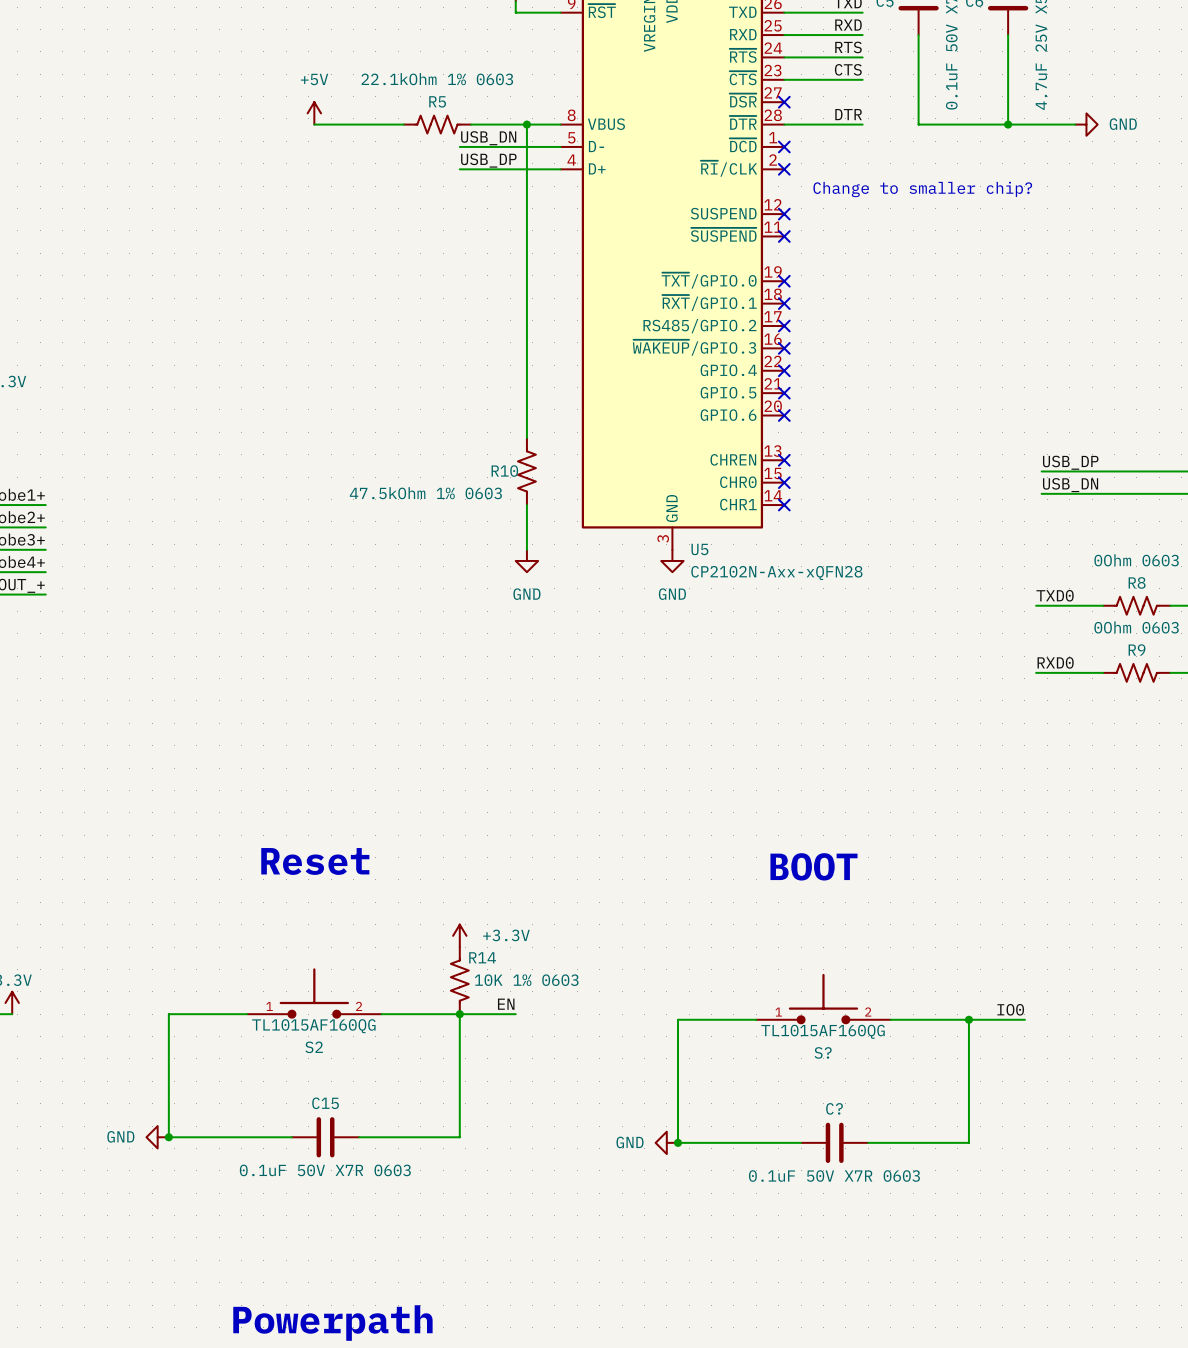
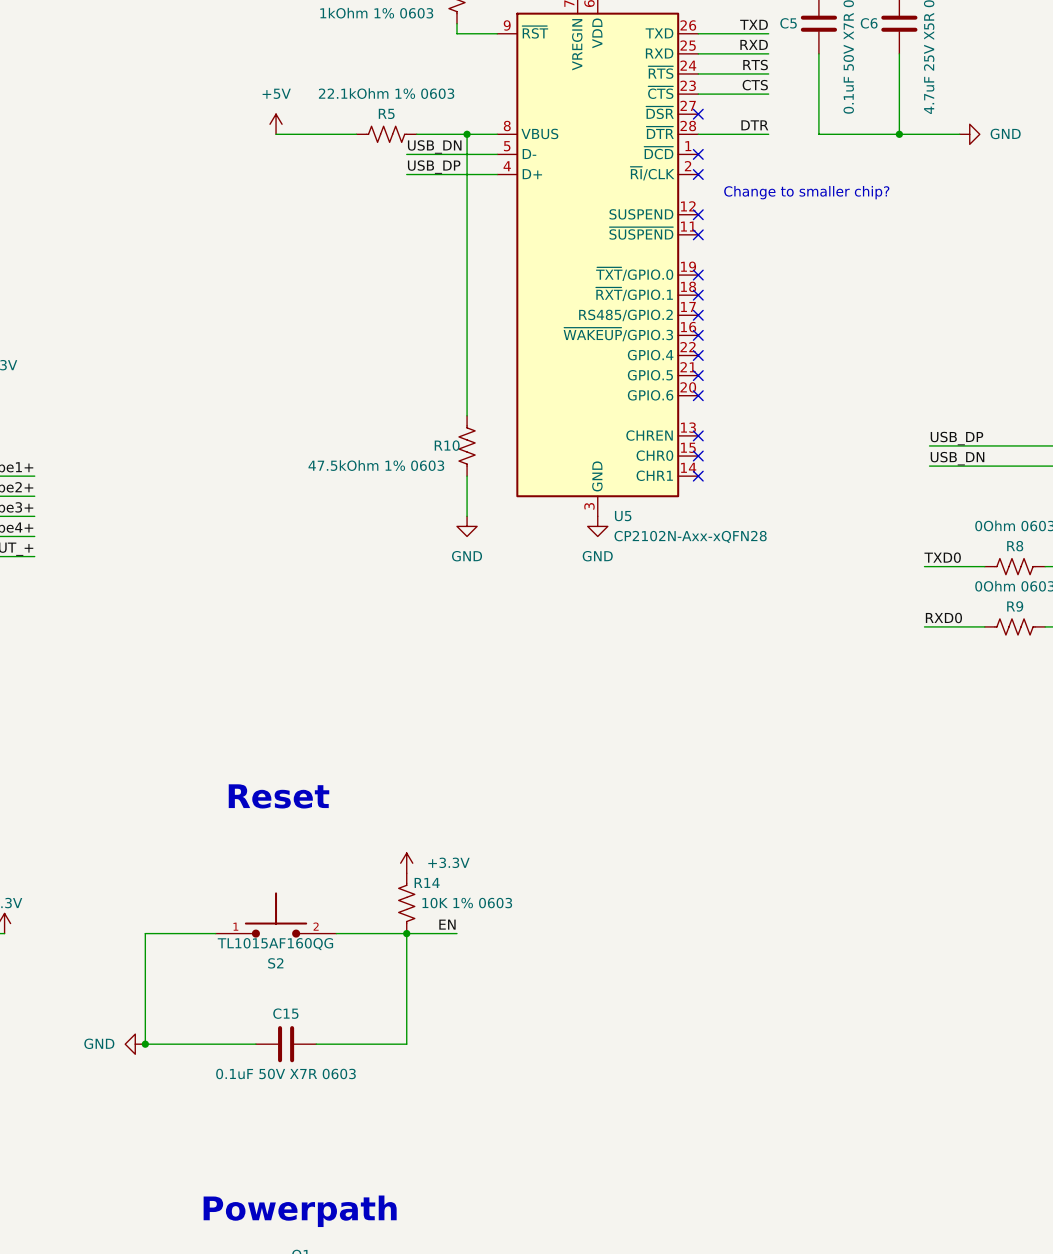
text: BOOT (813, 866) -> none
S?: TL1015AF160QG (823, 999) -> none
label: IO0 (1010, 1009) -> none
wire: (756, 1019) (678, 1019) (678, 1142) (801, 1142) -> none
wire: (890, 1019) (1024, 1019) -> none
wire: (968, 1019) (968, 1142) (868, 1142) -> none
junction: (968, 1019) -> none
power symbol: GND (666, 1142) -> none
junction: (678, 1142) -> none
C?: 0.1uF 50V X7R 0603 (834, 1142) -> none

